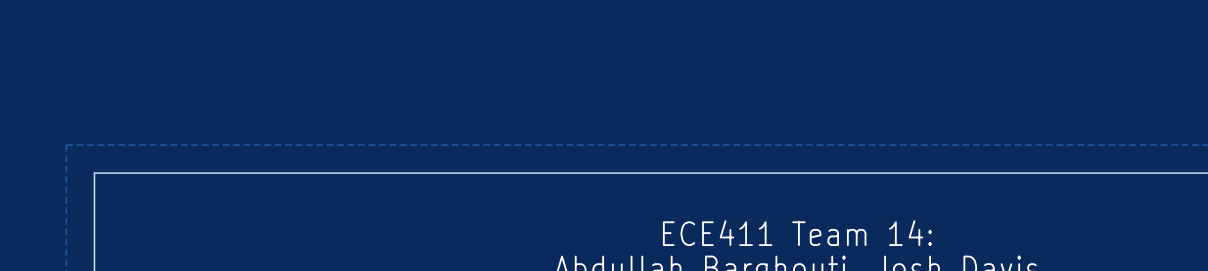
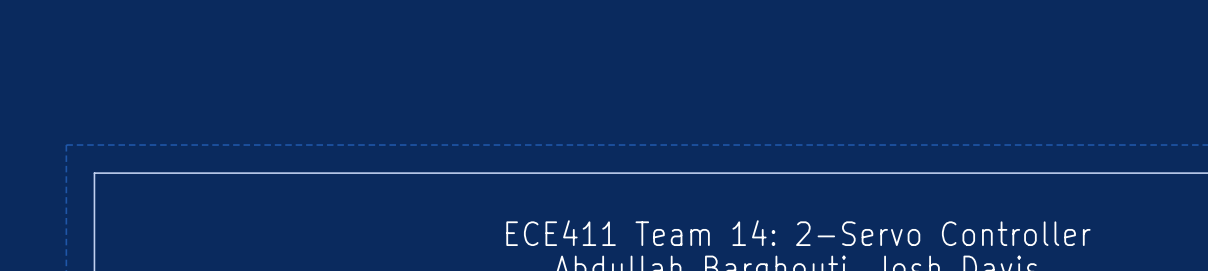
text: ECE411 Team 14: (797, 233) -> ECE411 Team 14: 2-Servo Controller (798, 233)

